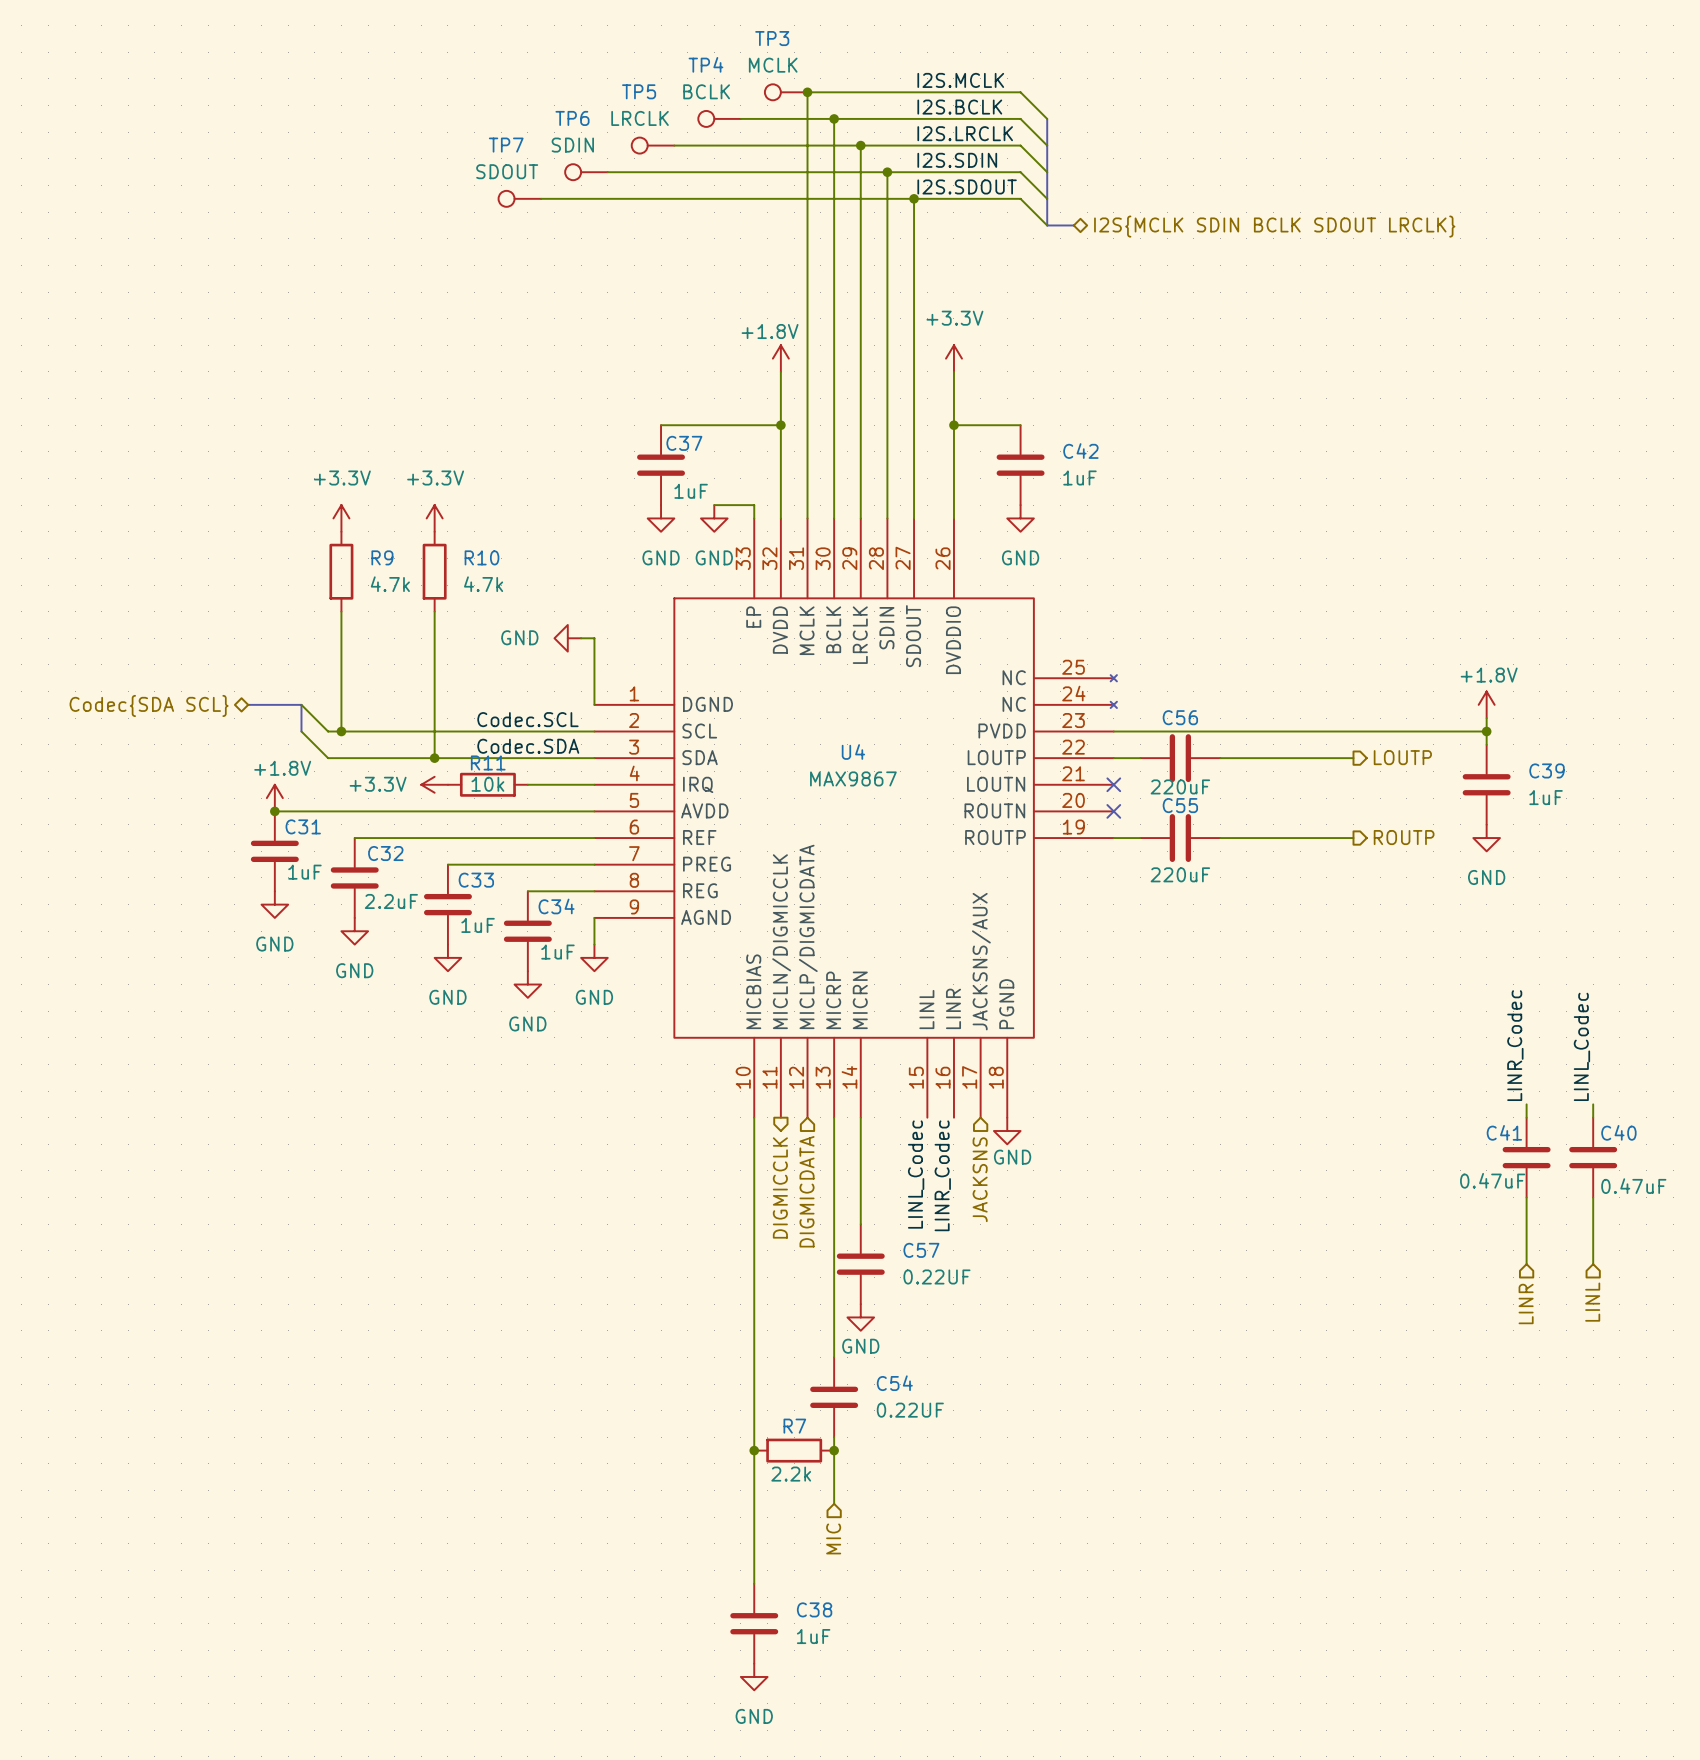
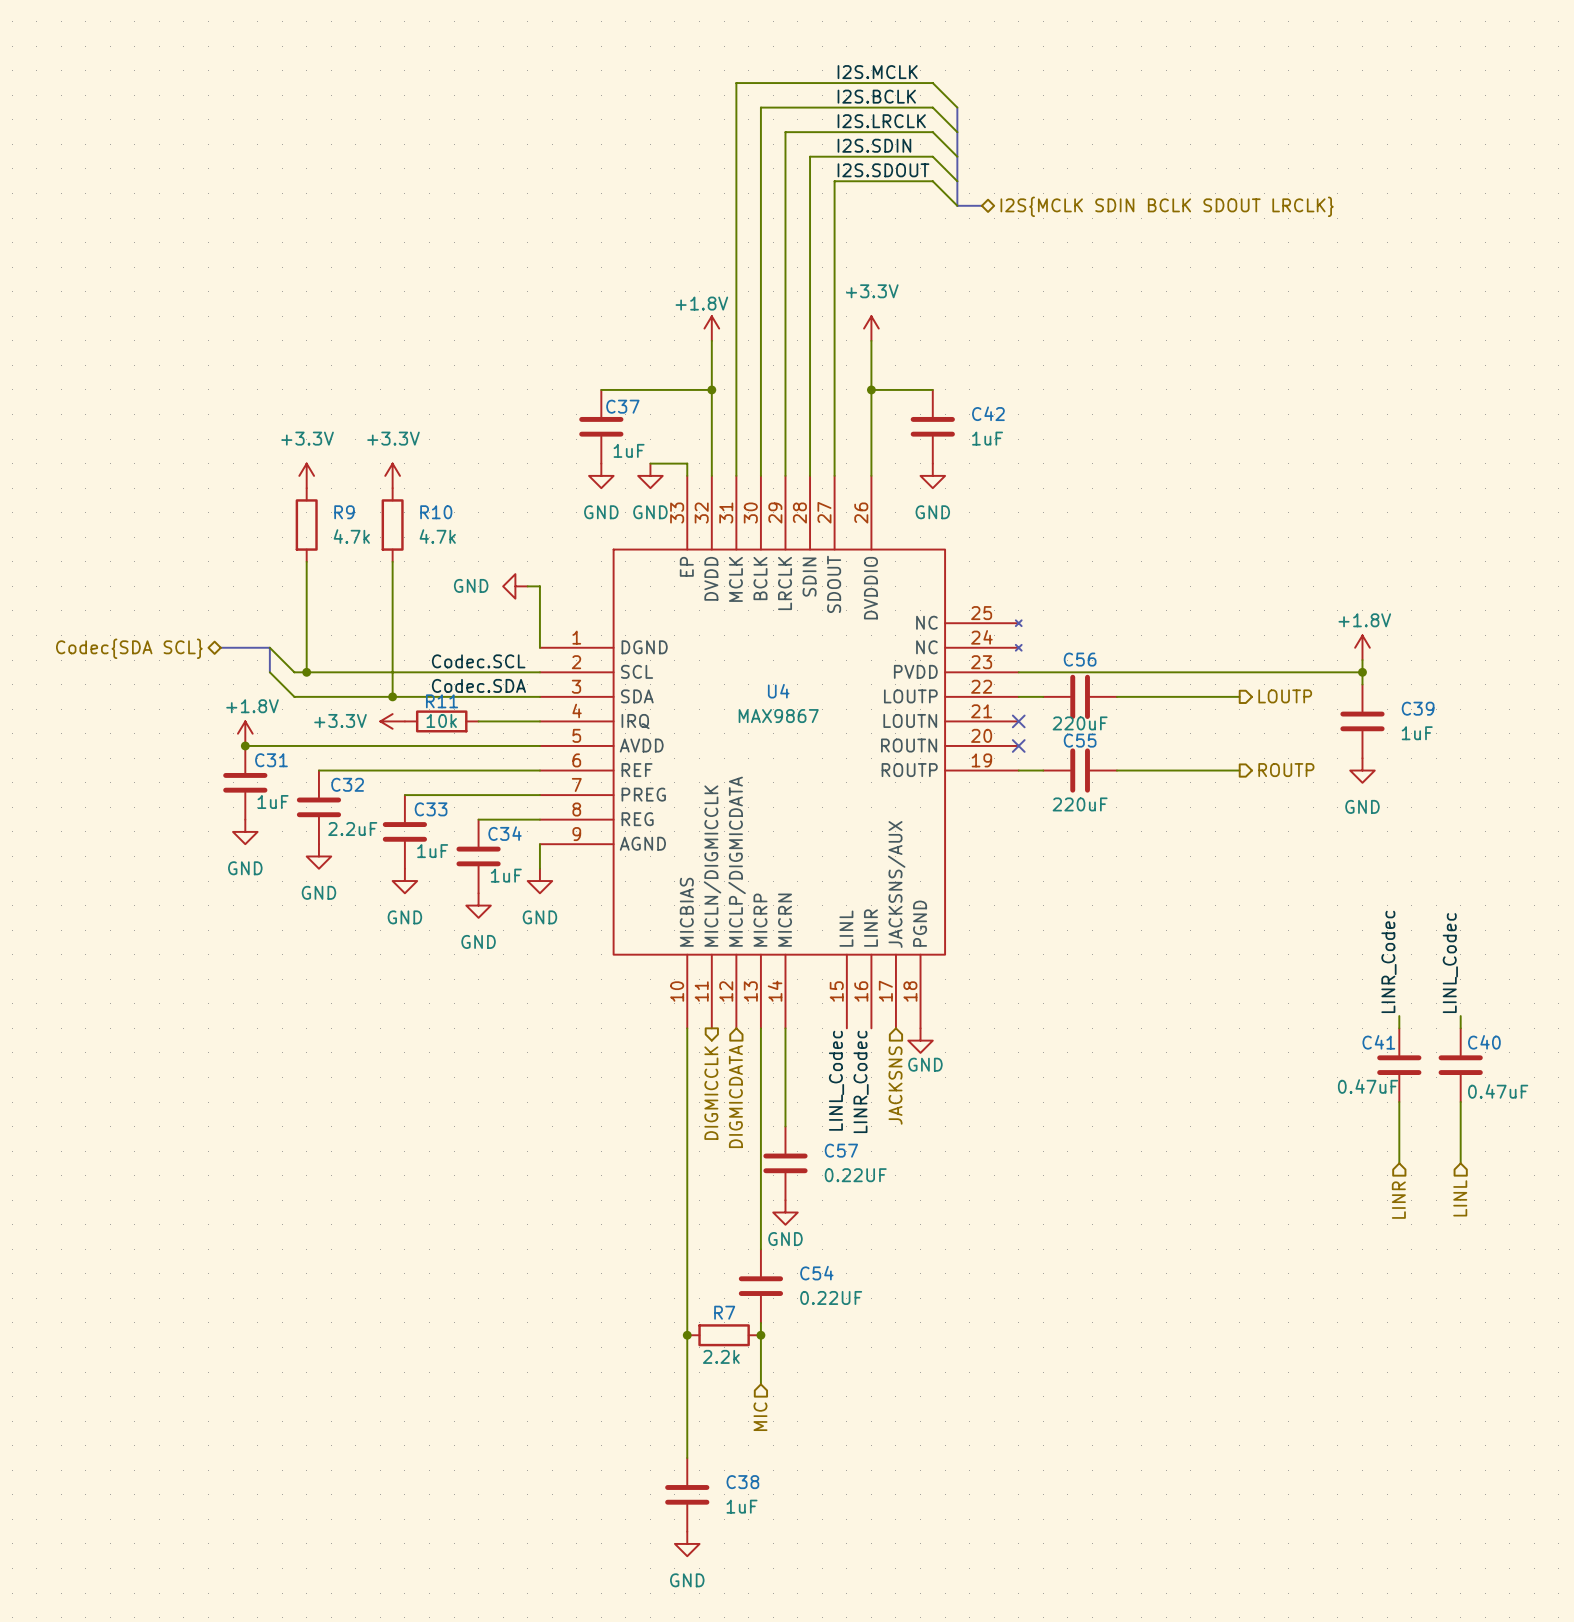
TP3: MCLK (786, 92) -> none
junction: (807, 92) -> none
TP4: BCLK (719, 118) -> none
wire: (740, 118) (834, 118) -> none
junction: (834, 118) -> none
TP5: LRCLK (653, 145) -> none
wire: (674, 145) (860, 145) -> none
junction: (860, 145) -> none
TP6: SDIN (586, 172) -> none
wire: (607, 172) (887, 172) -> none
junction: (887, 172) -> none
TP7: SDOUT (519, 198) -> none
wire: (541, 198) (914, 198) -> none
junction: (914, 198) -> none

